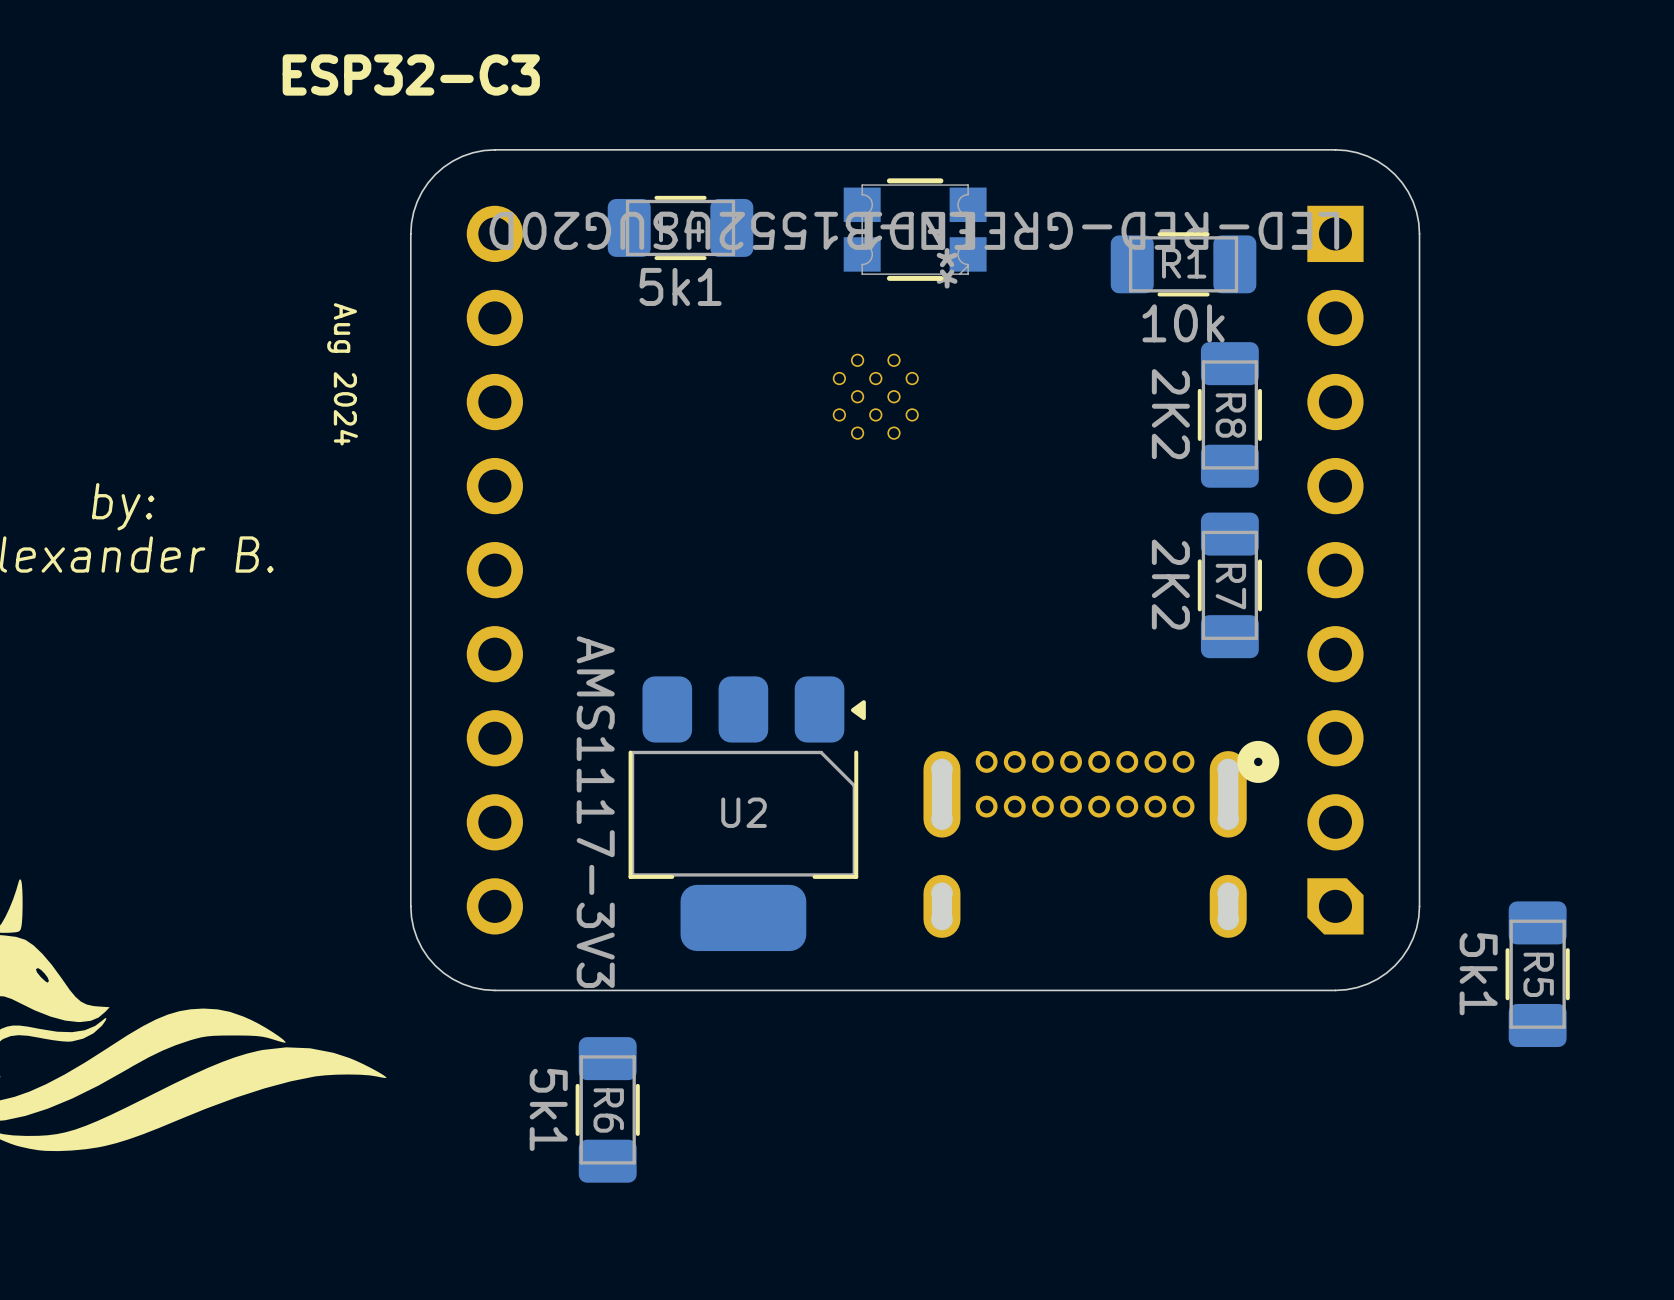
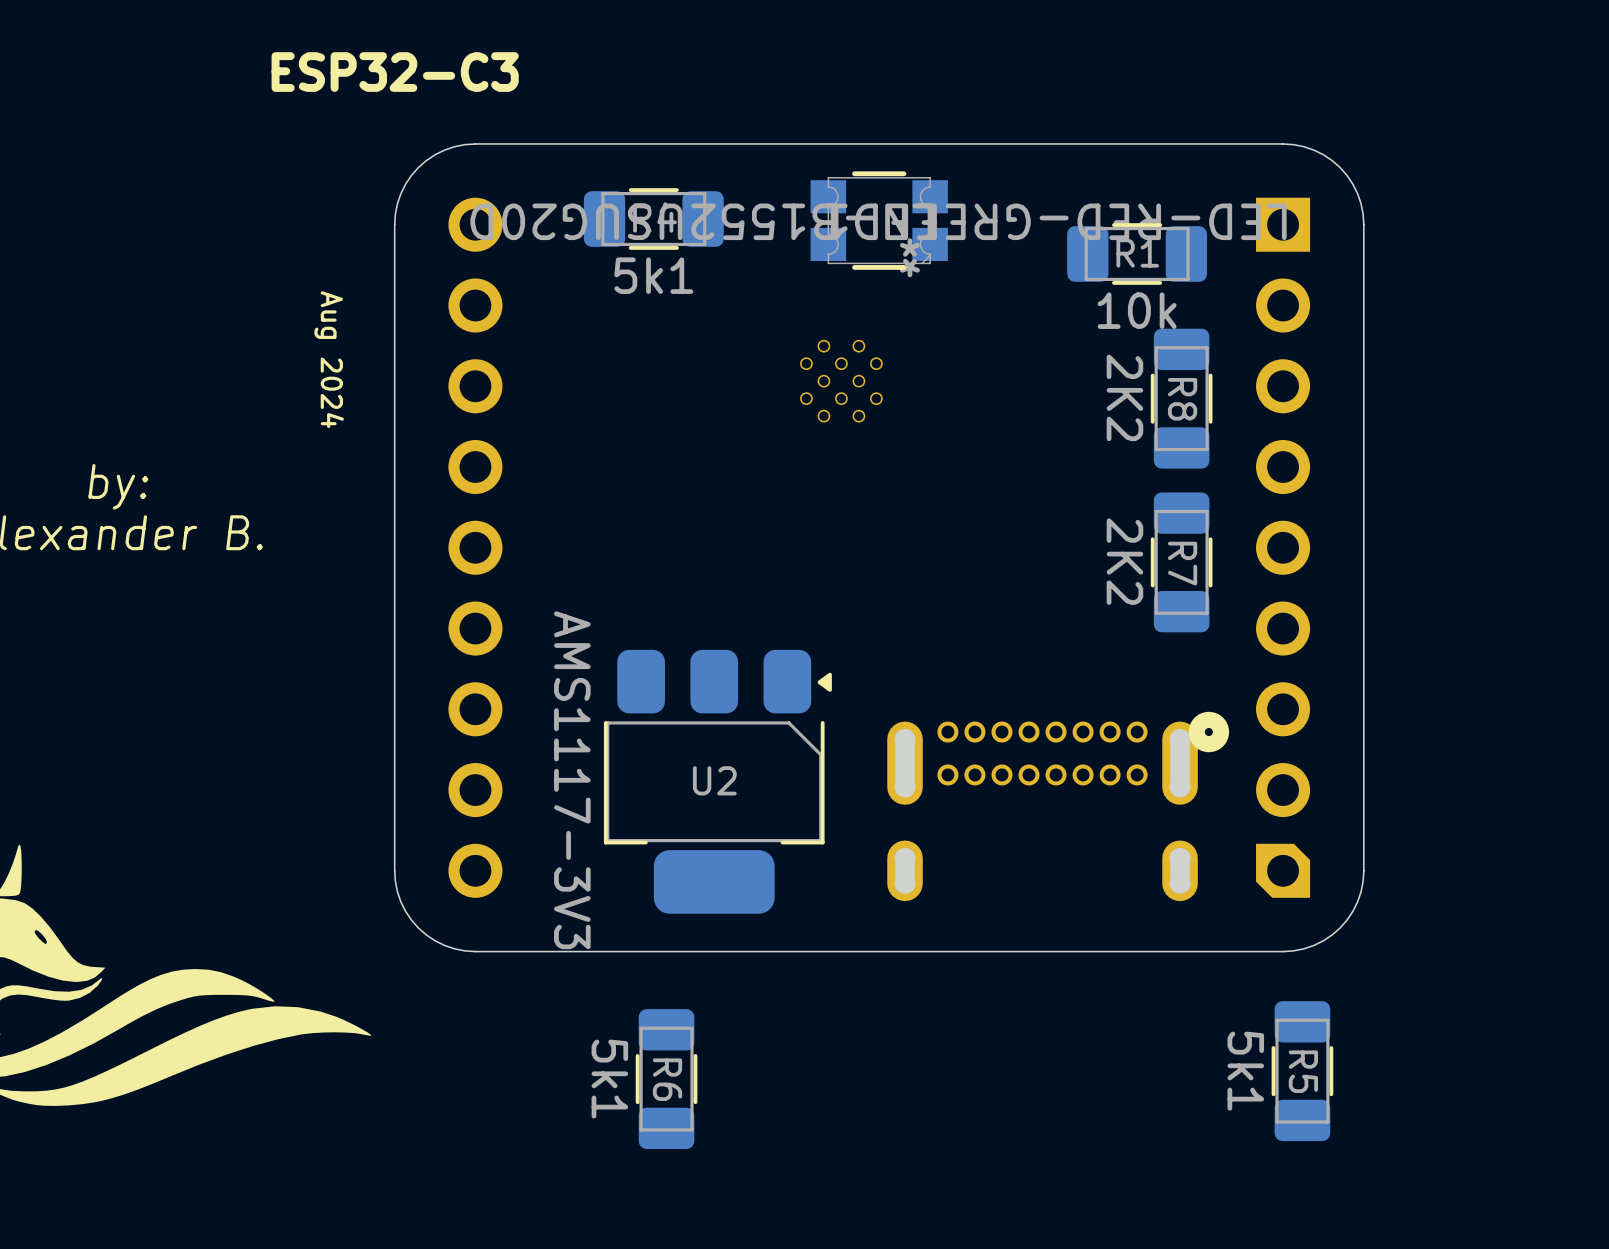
R5 position: (1537, 974) -> (1302, 1071)
R6 position: (607, 1109) -> (666, 1079)

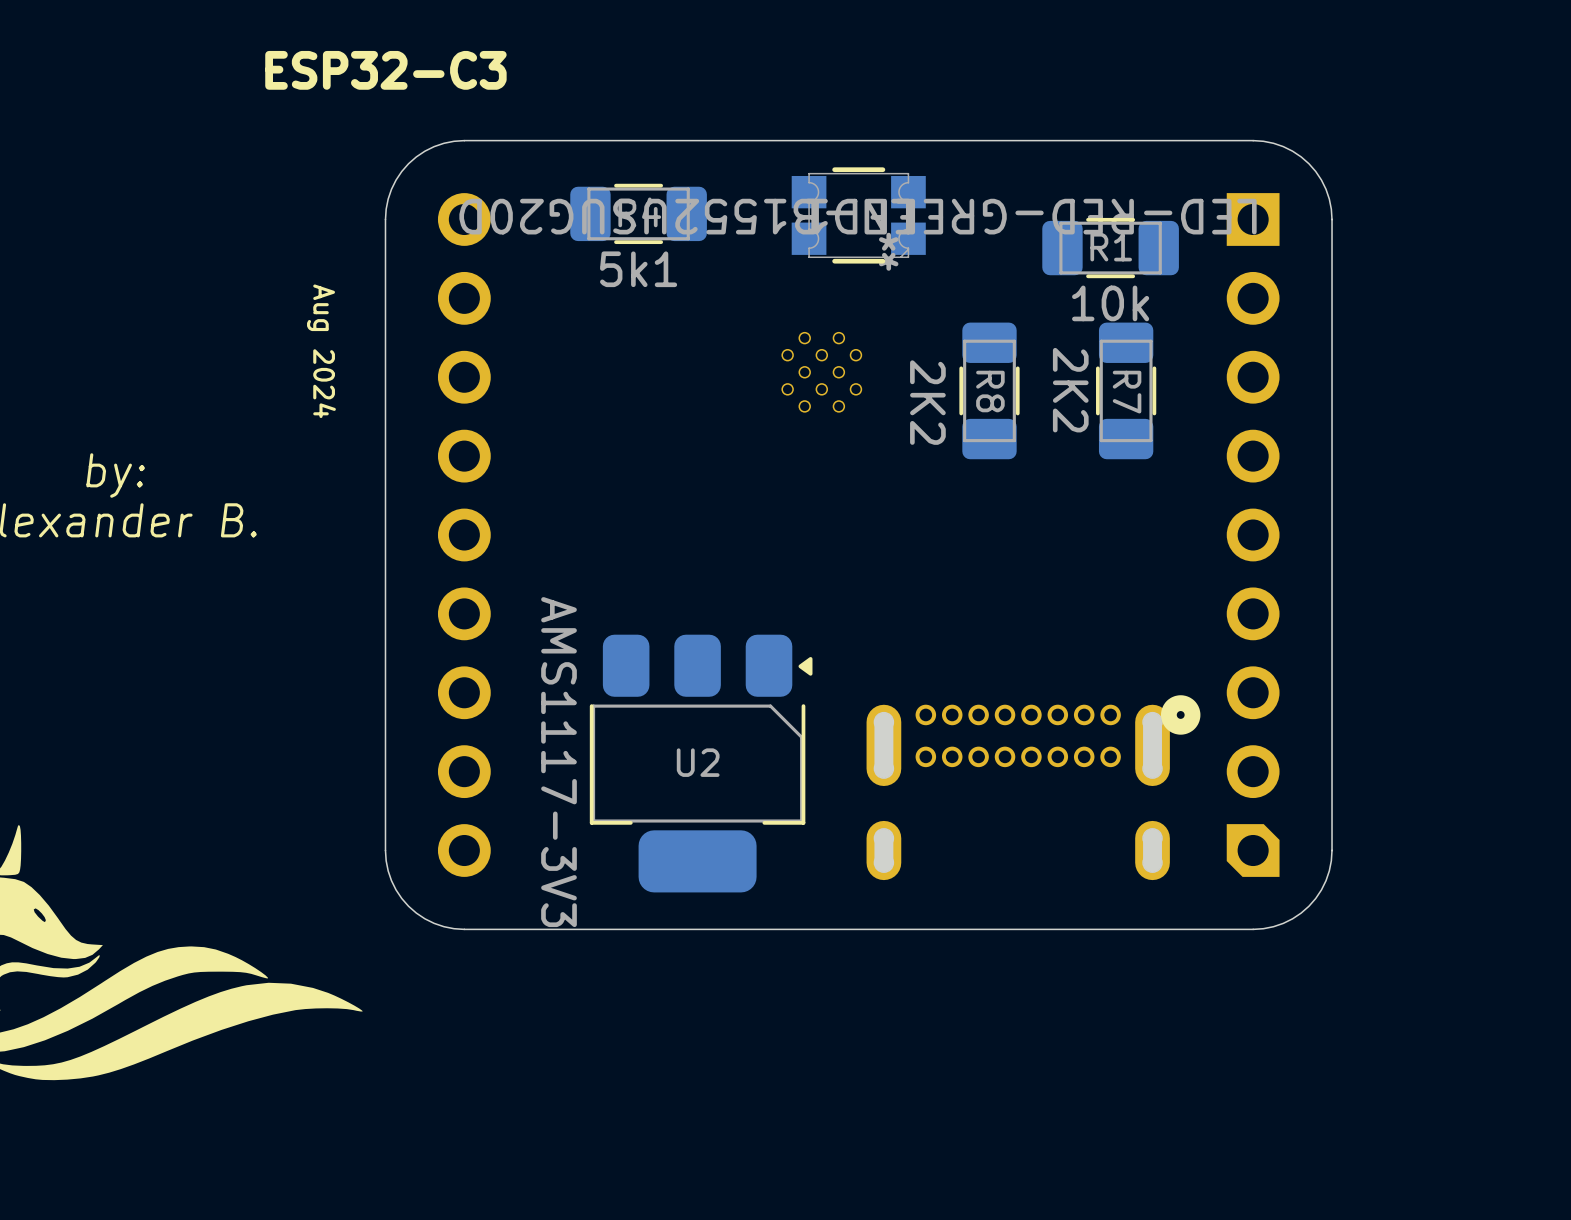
R8 value position: 2K2 (1124, 397) -> 2K2 (927, 402)
R8 position: (1181, 398) -> (989, 390)
R7 position: (1181, 562) -> (1126, 390)
R5: 5k1 (1302, 1071) -> none
R6: 5k1 (666, 1079) -> none

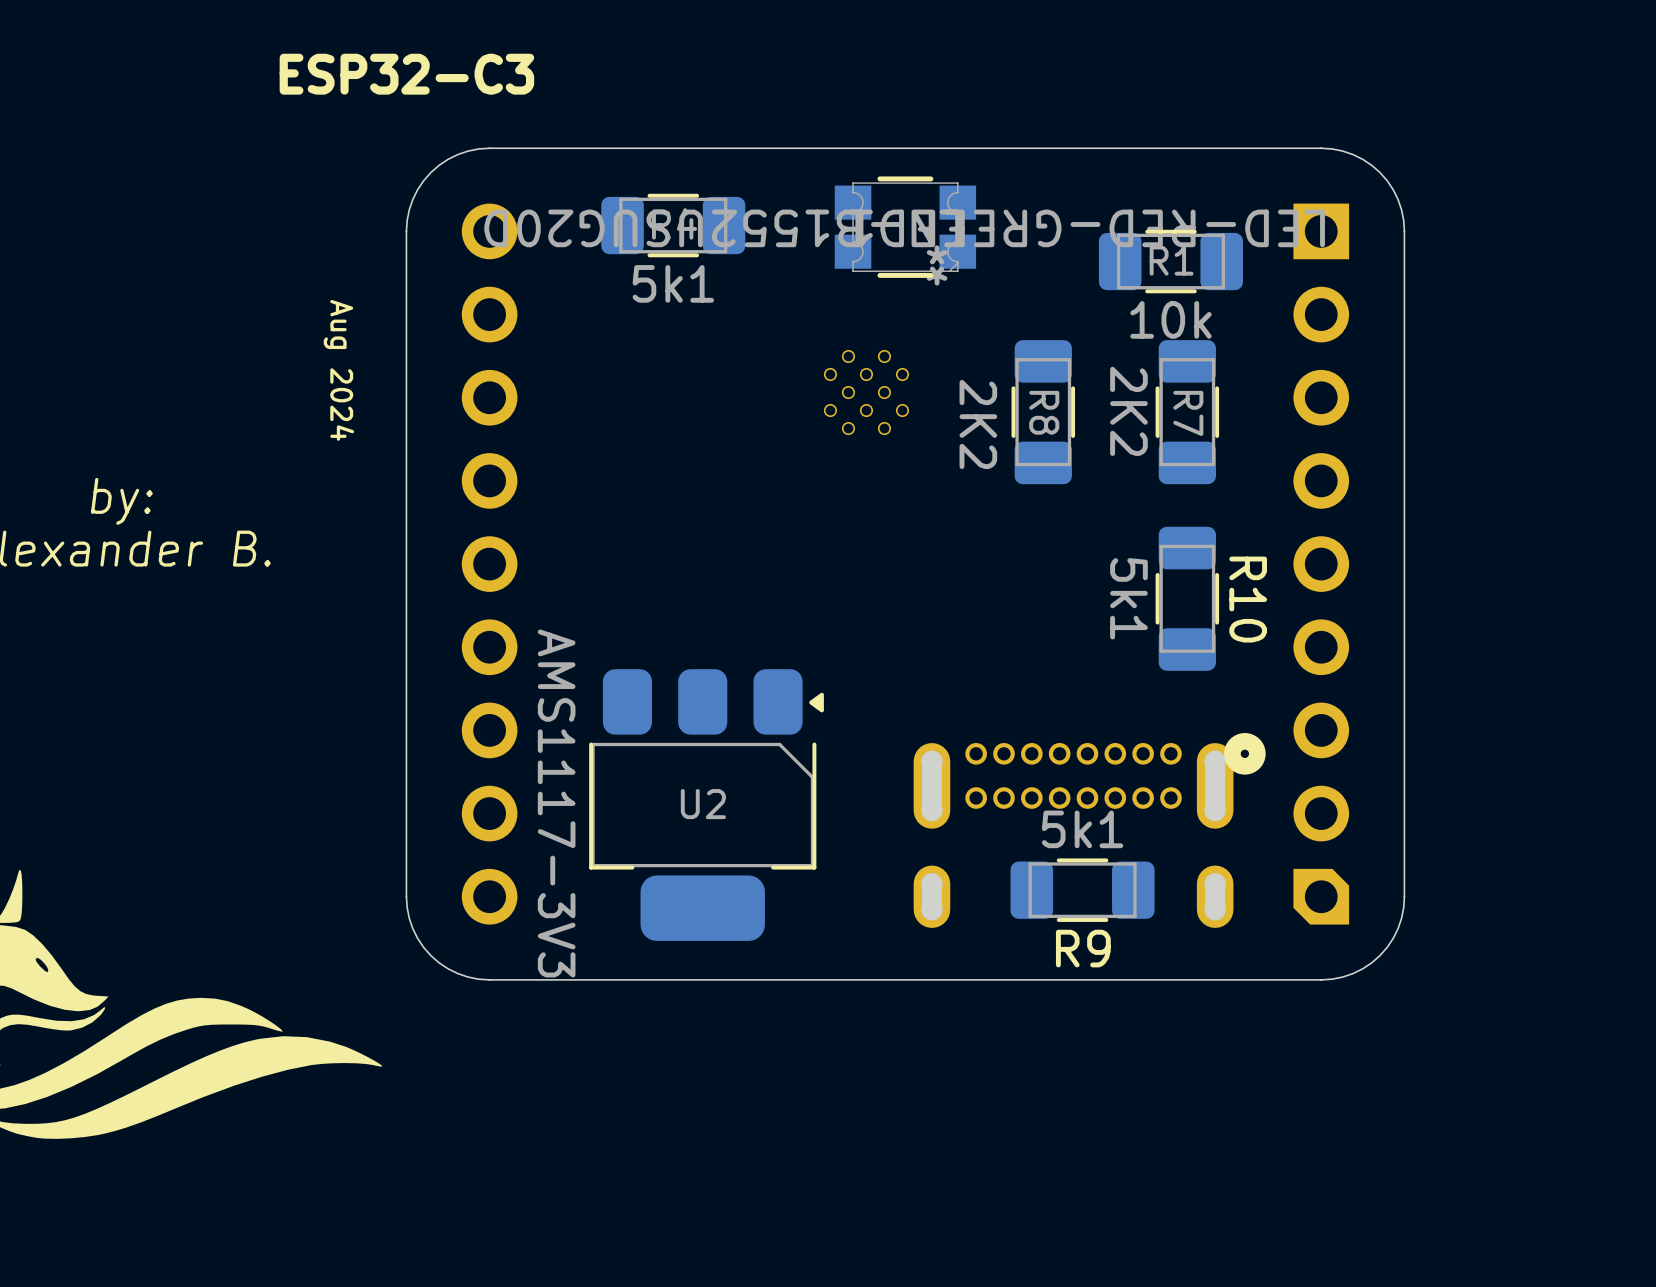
R10: none -> 5k1 (1187, 598)
U2 position: (701, 763) -> (706, 805)
R9: none -> 5k1 (1082, 890)

